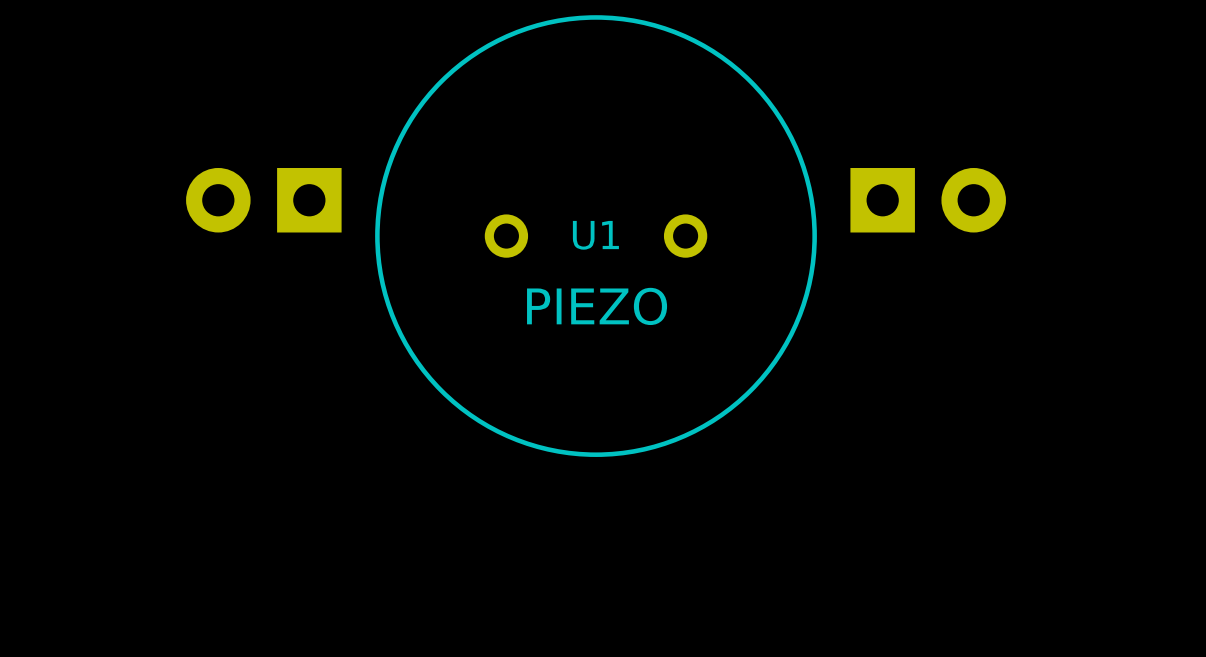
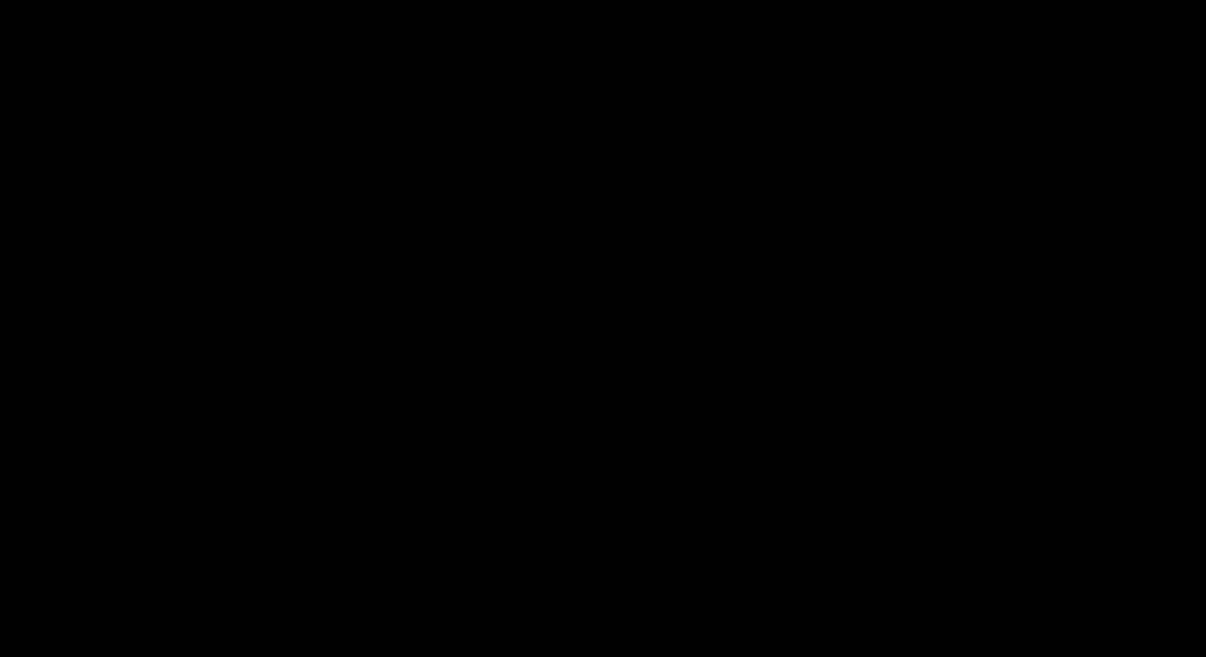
part: (263, 200) -> none
part: (928, 200) -> none
U1: (596, 236) -> none

